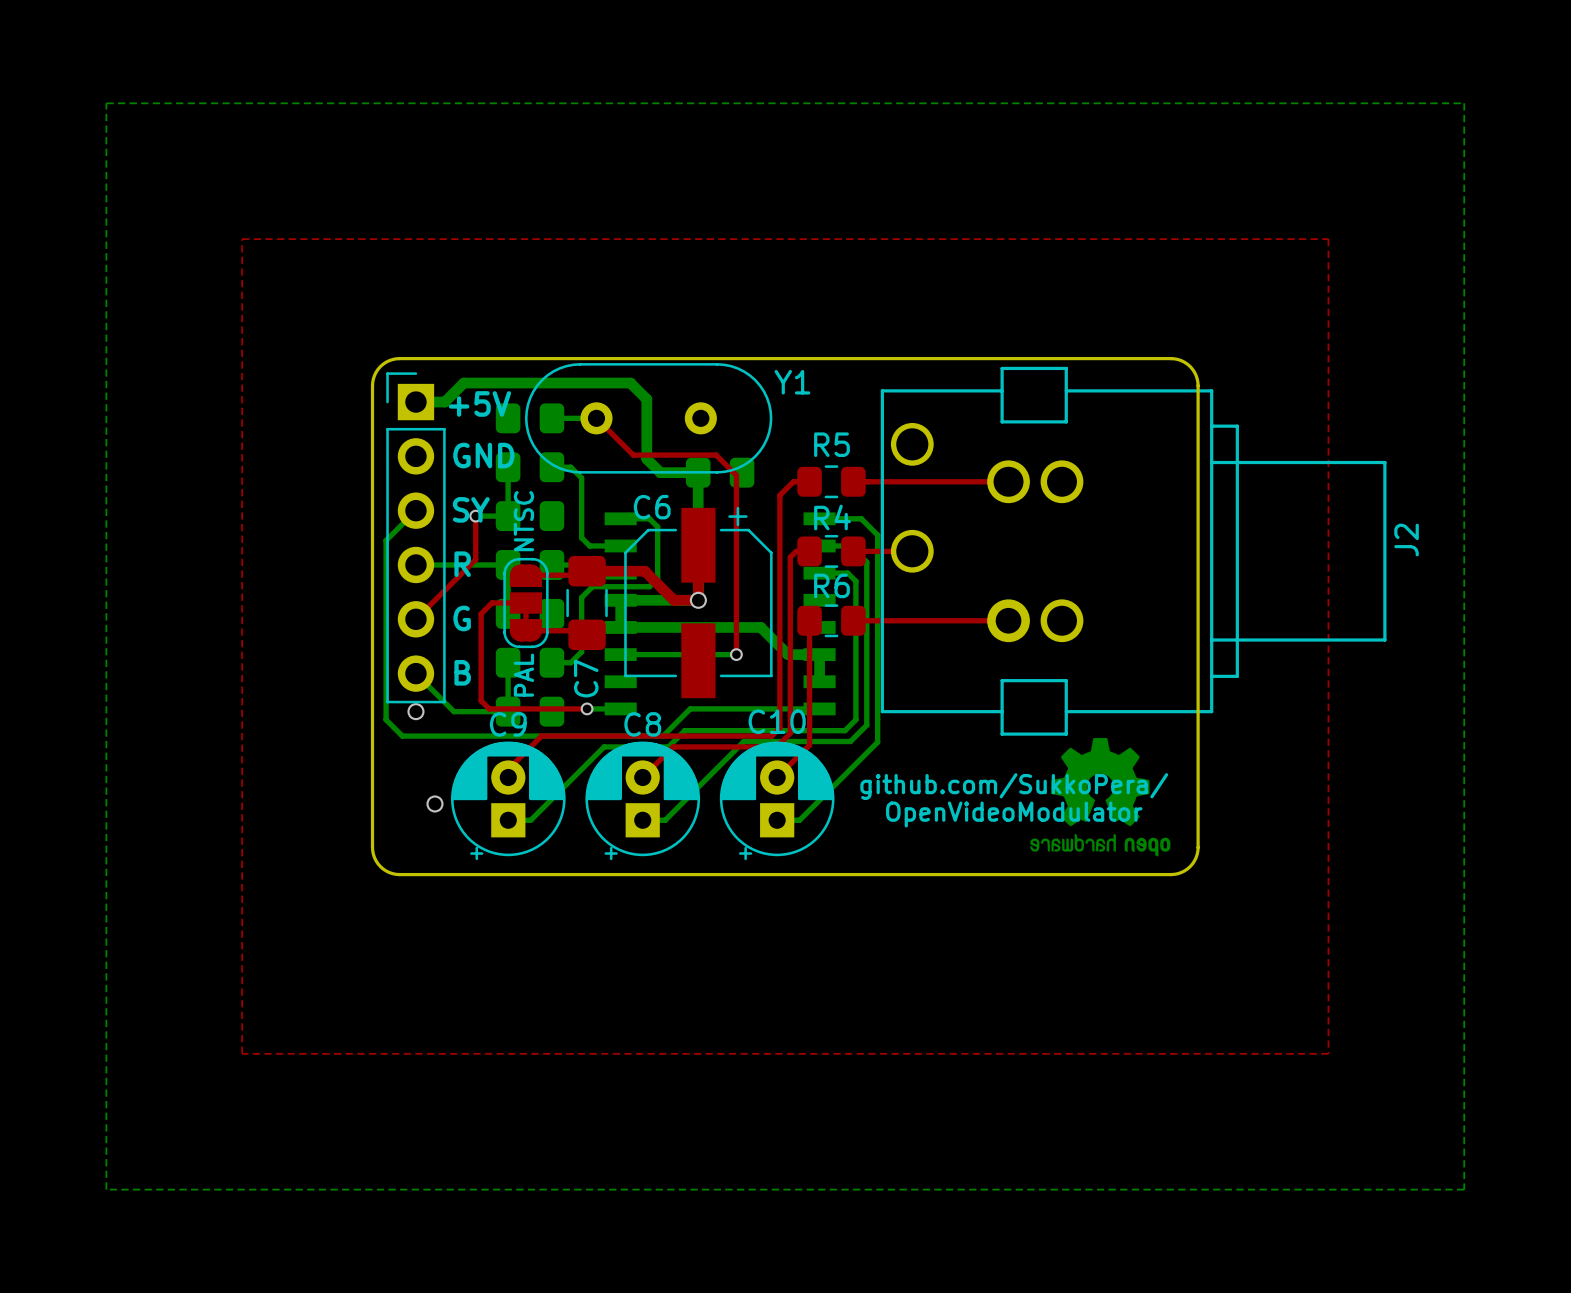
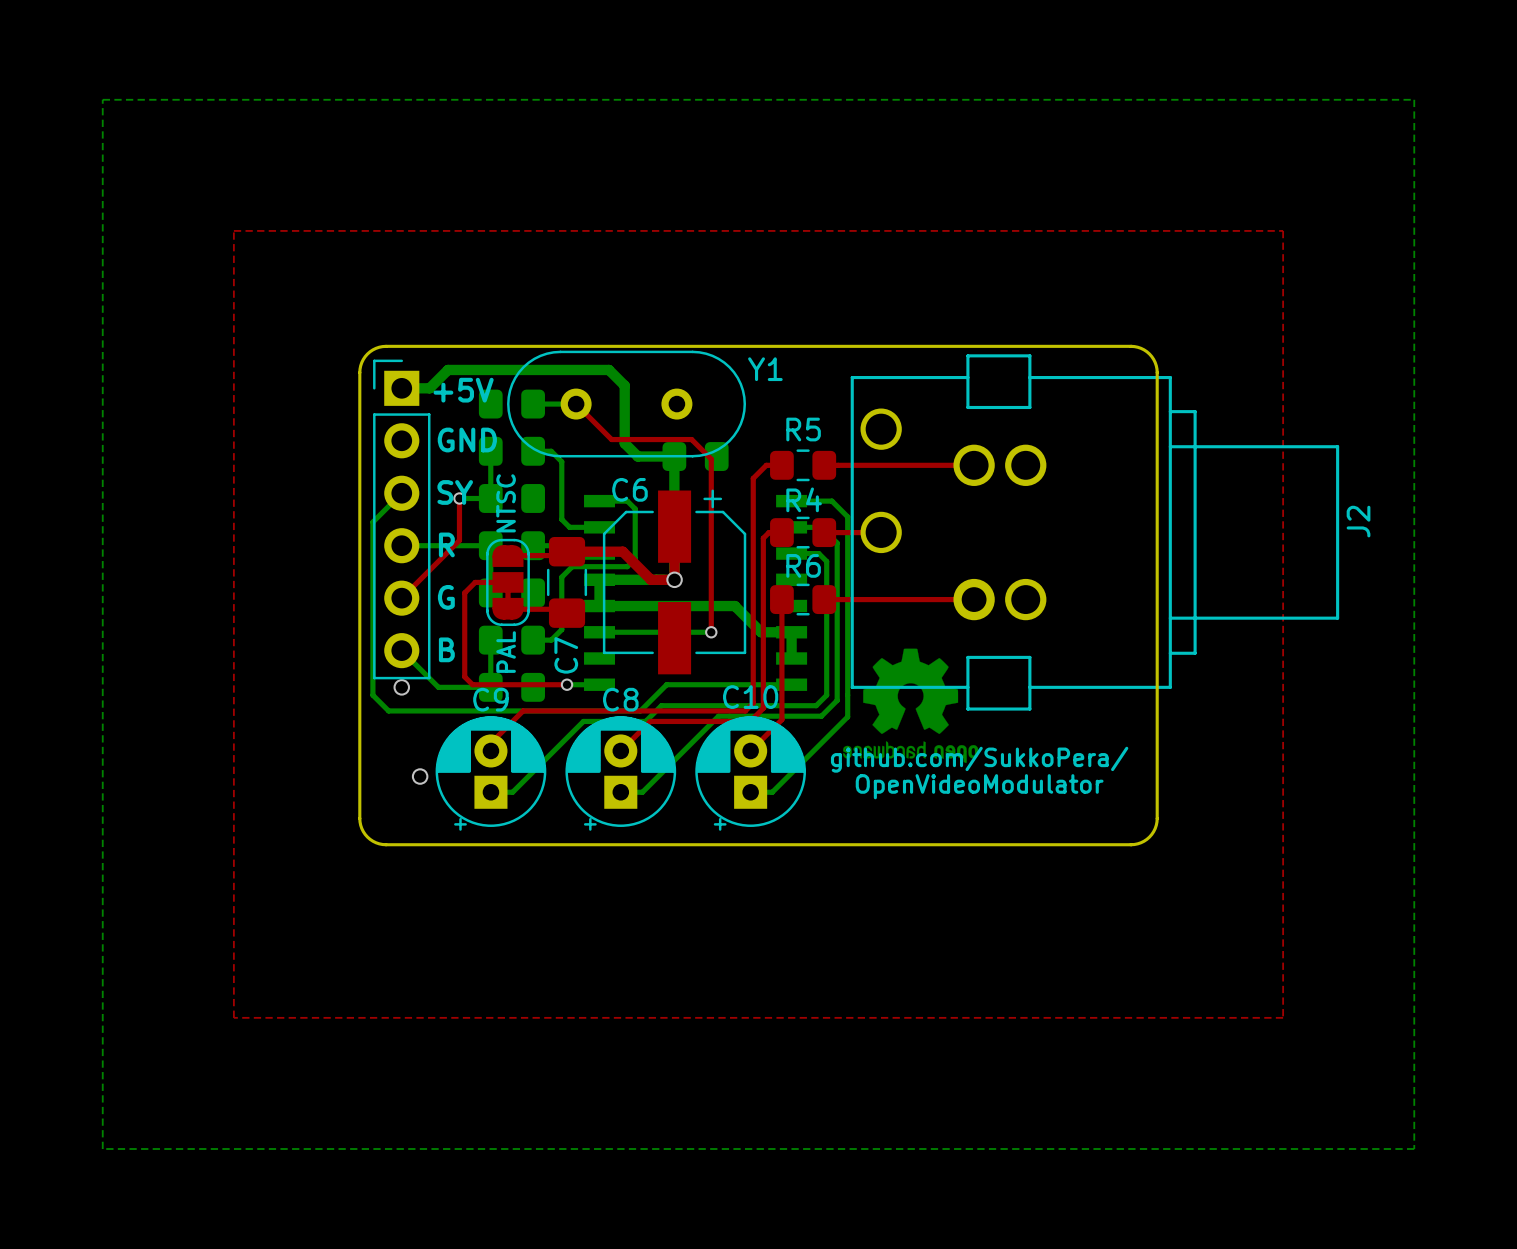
drawing position: (1100, 797) -> (910, 705)

